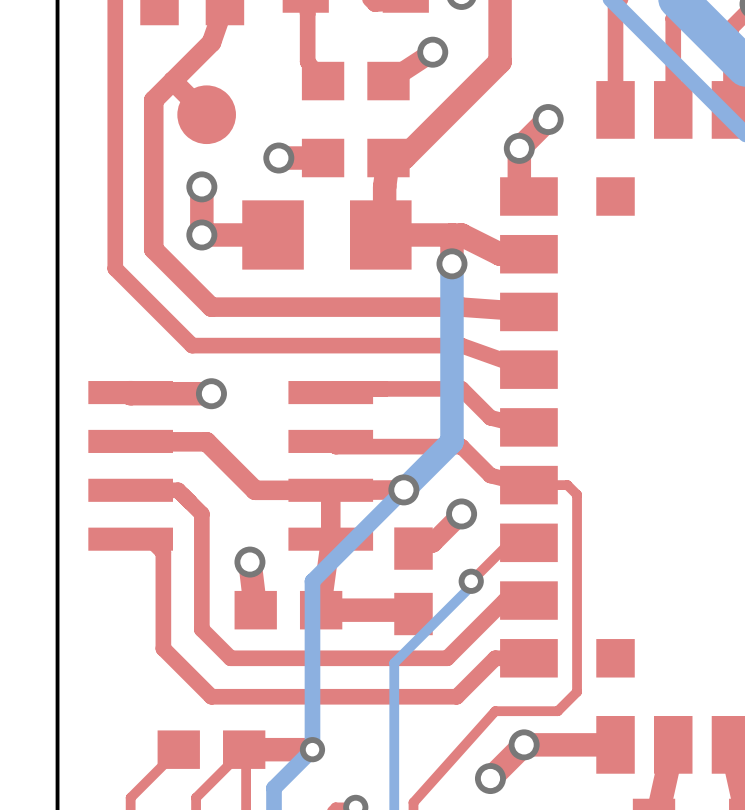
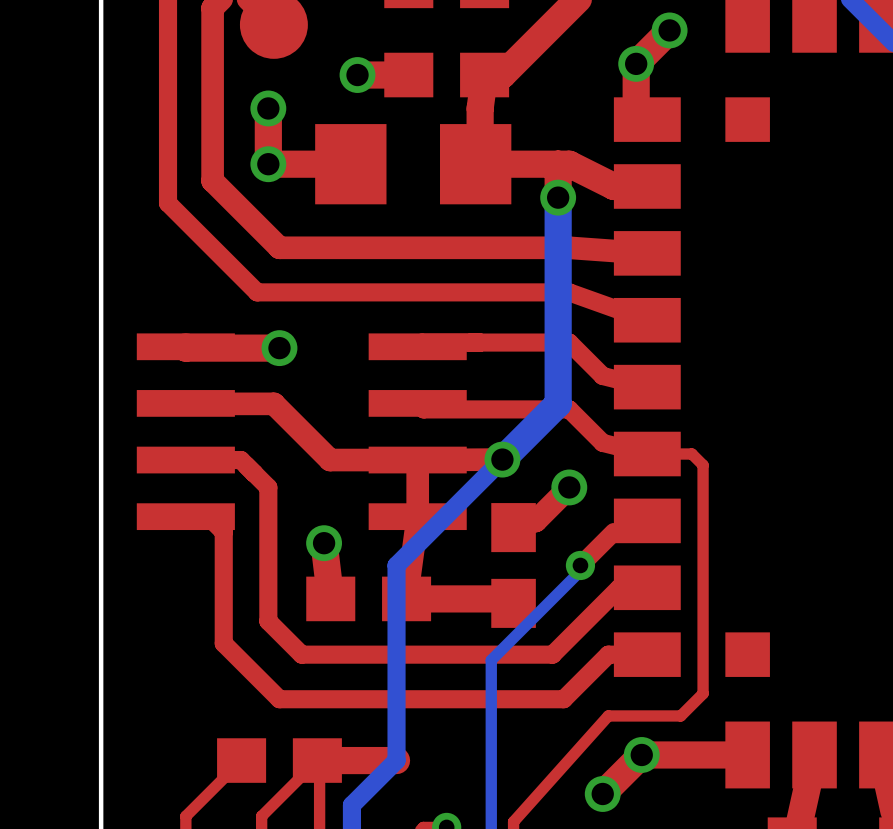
top track width: thin (500, 552) (471, 581) -> thick (613, 532) (580, 565)
via: (312, 749) -> none

